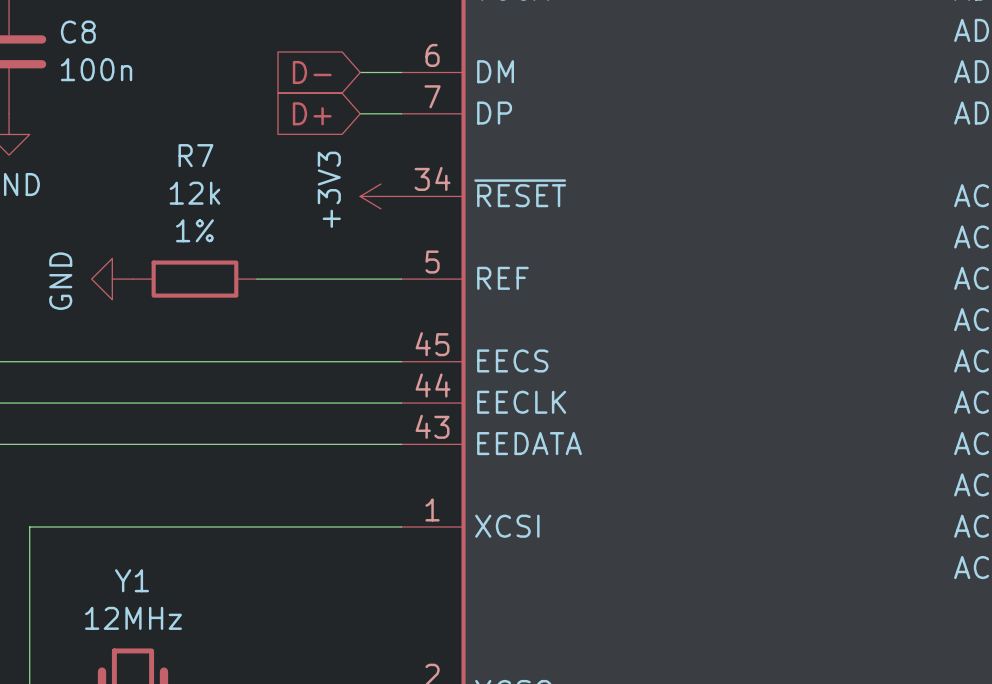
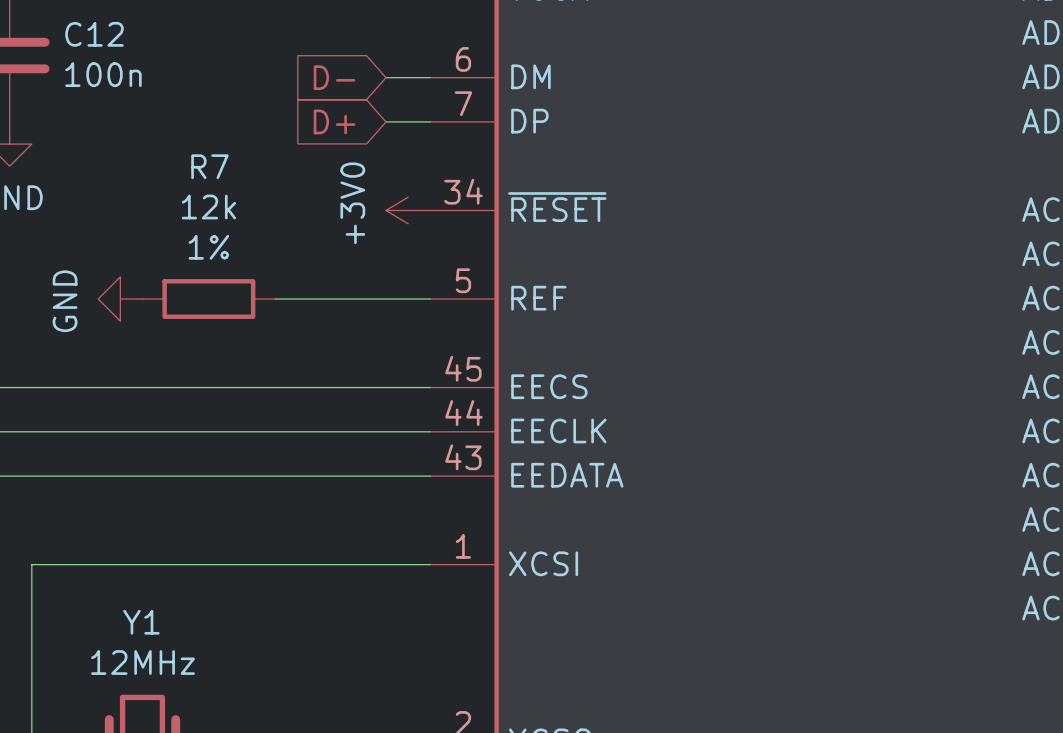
C8 name: C8 (78, 32) -> C12 (94, 34)
power symbol: +3V3 (380, 196) -> +3V0 (408, 210)

